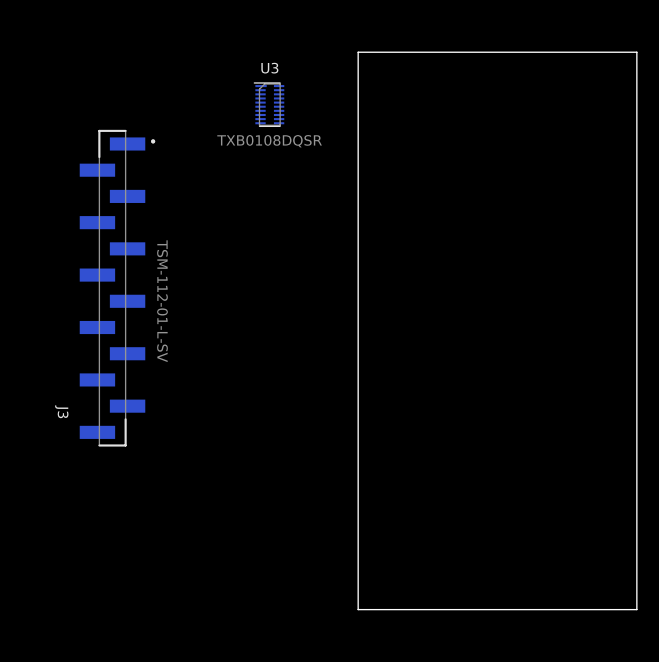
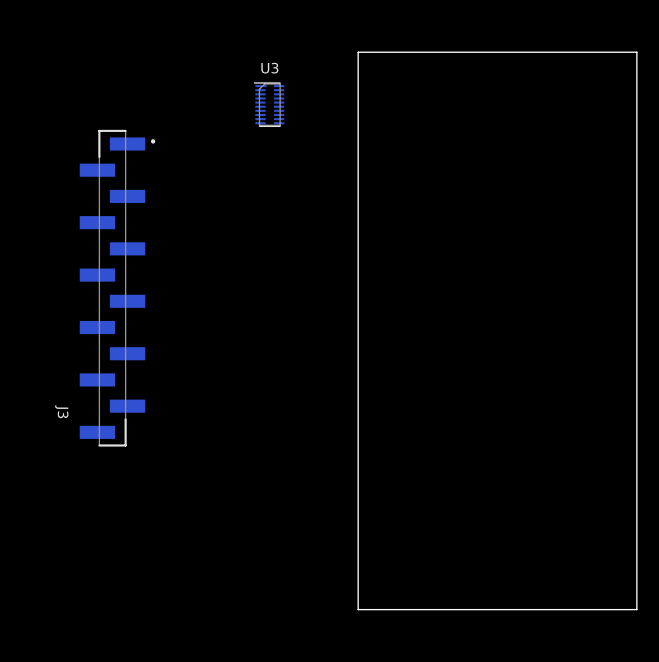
U3 value: TXB0108DQSR (269, 141) -> none
J3 value: TSM-112-01-L-SV (162, 301) -> none

